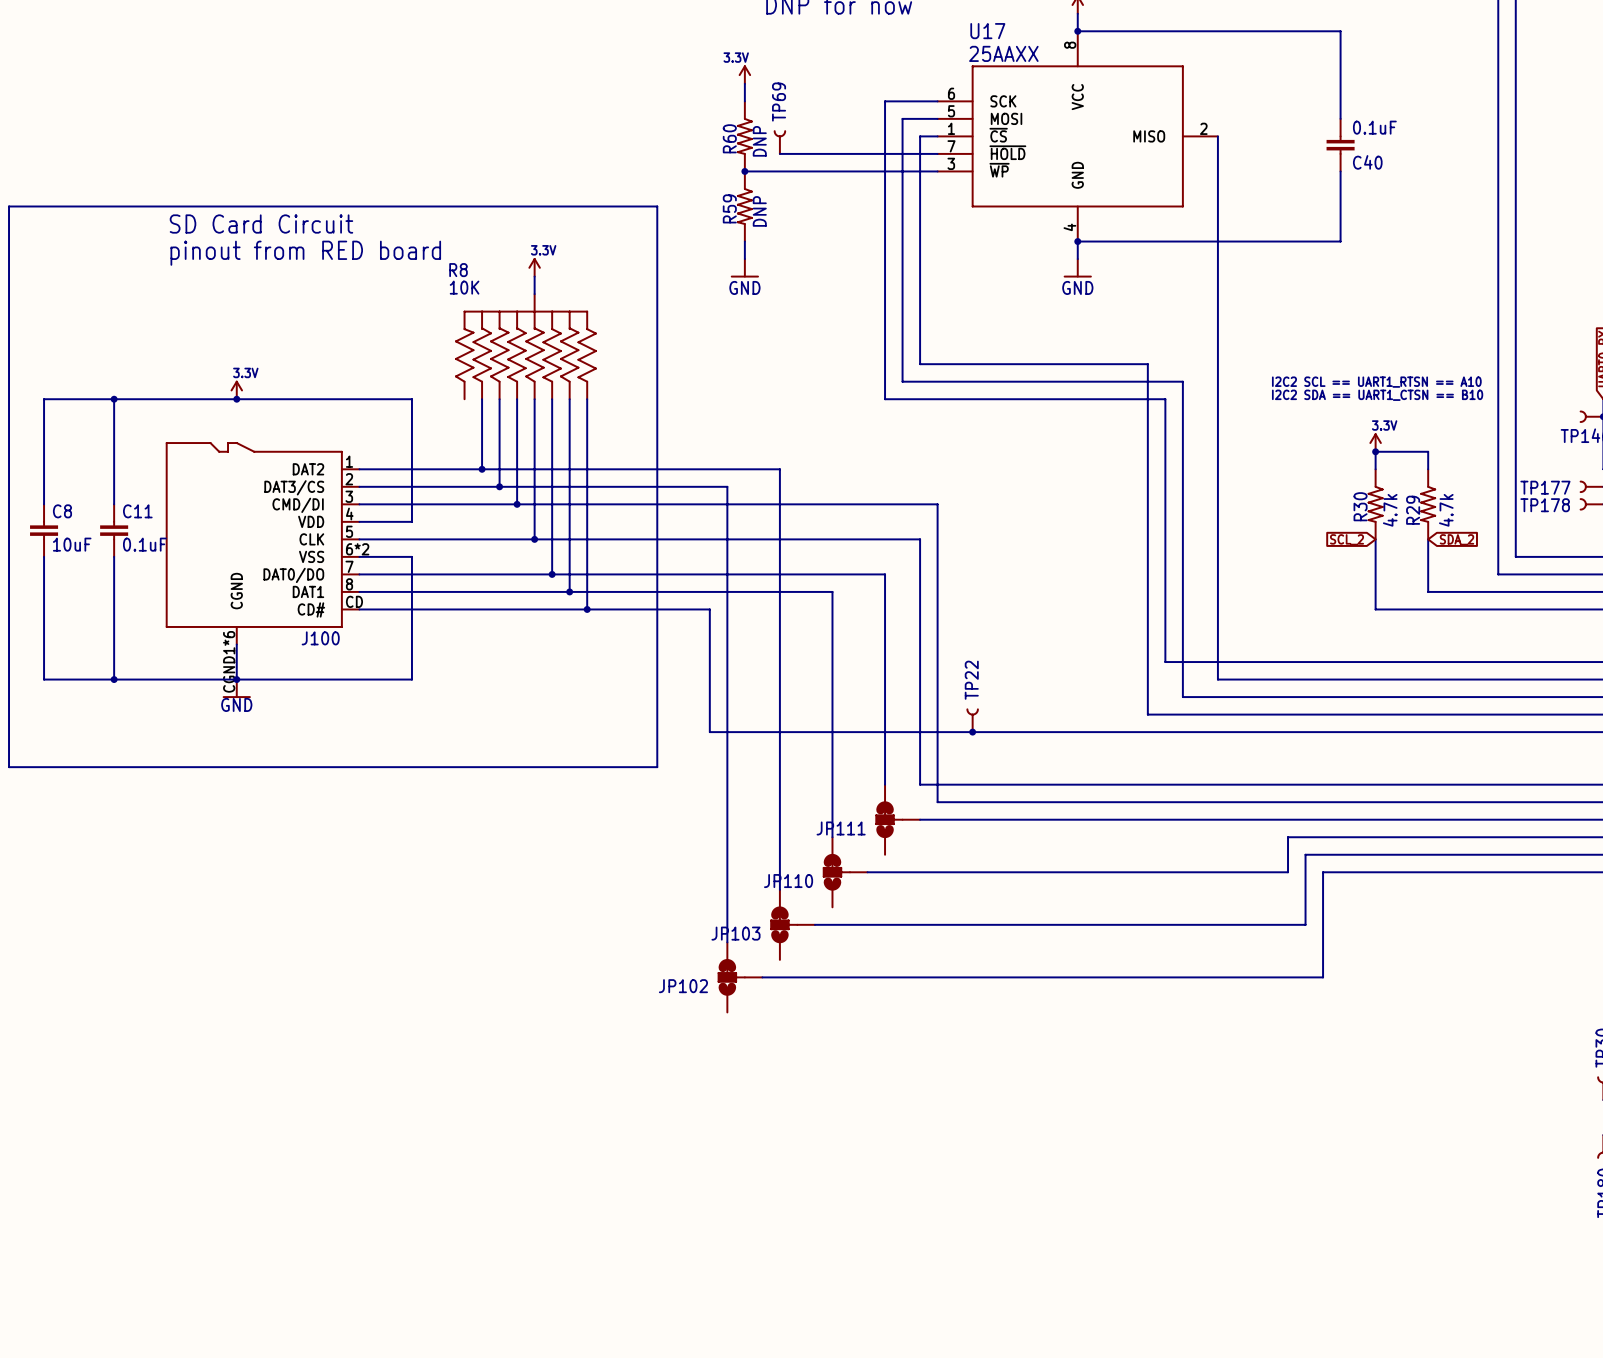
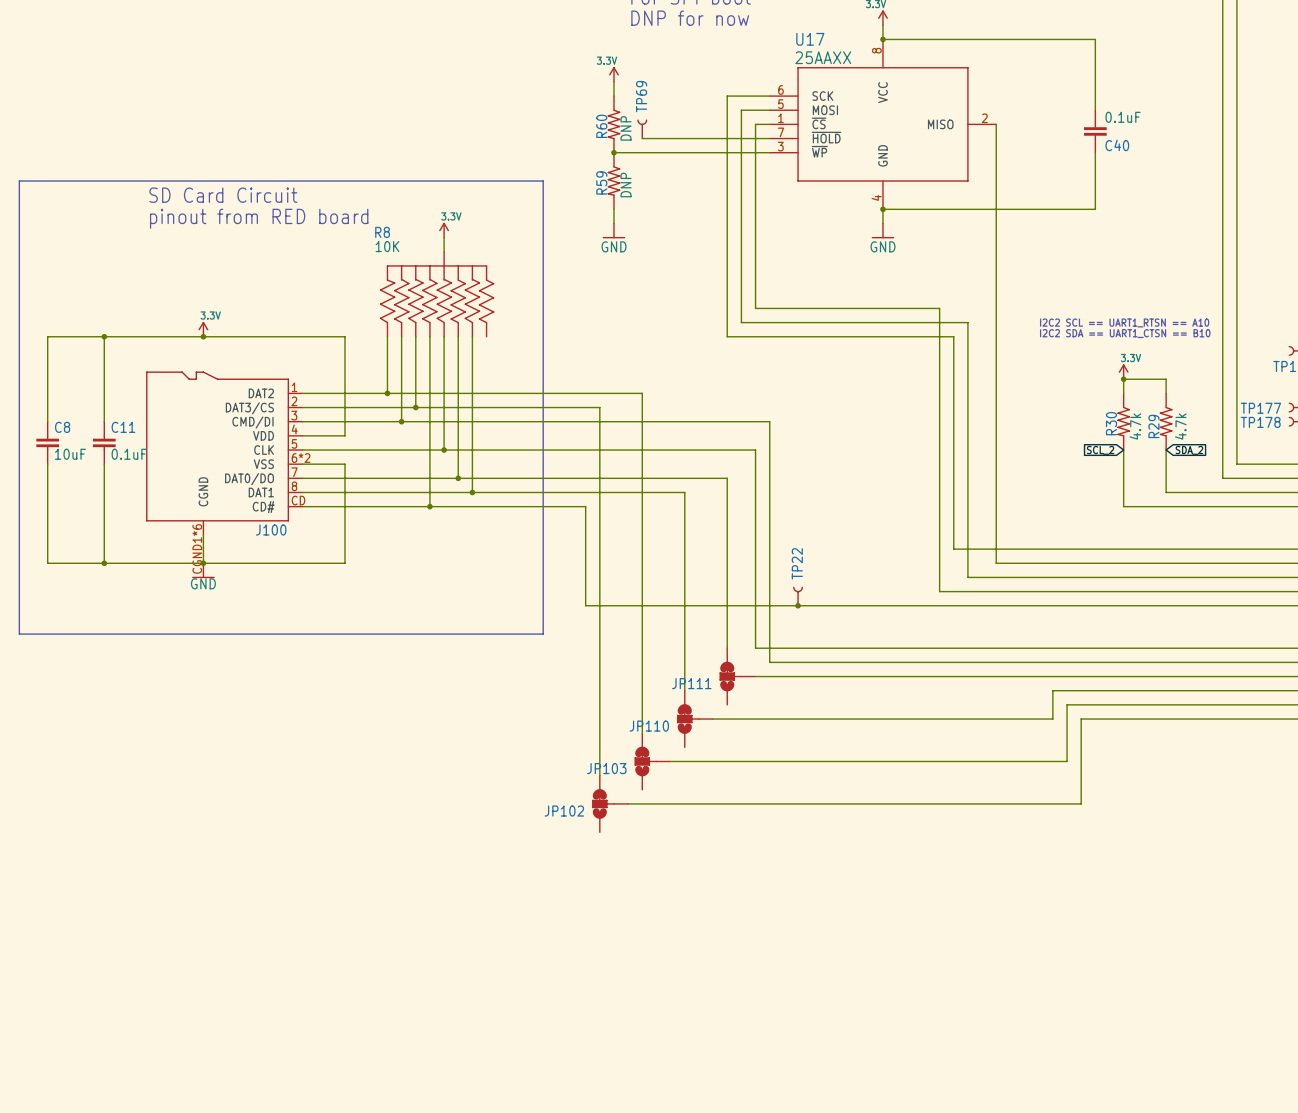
wire: none -> (387, 336) (387, 393)
wire: (587, 399) (587, 609) -> none
junction: none -> (387, 393)
wire: none -> (401, 393) (401, 421)
junction: (482, 469) -> none
junction: none -> (401, 421)
wire: none -> (429, 421) (429, 506)
junction: (517, 504) -> none
junction: none -> (429, 506)
junction: (587, 609) -> none

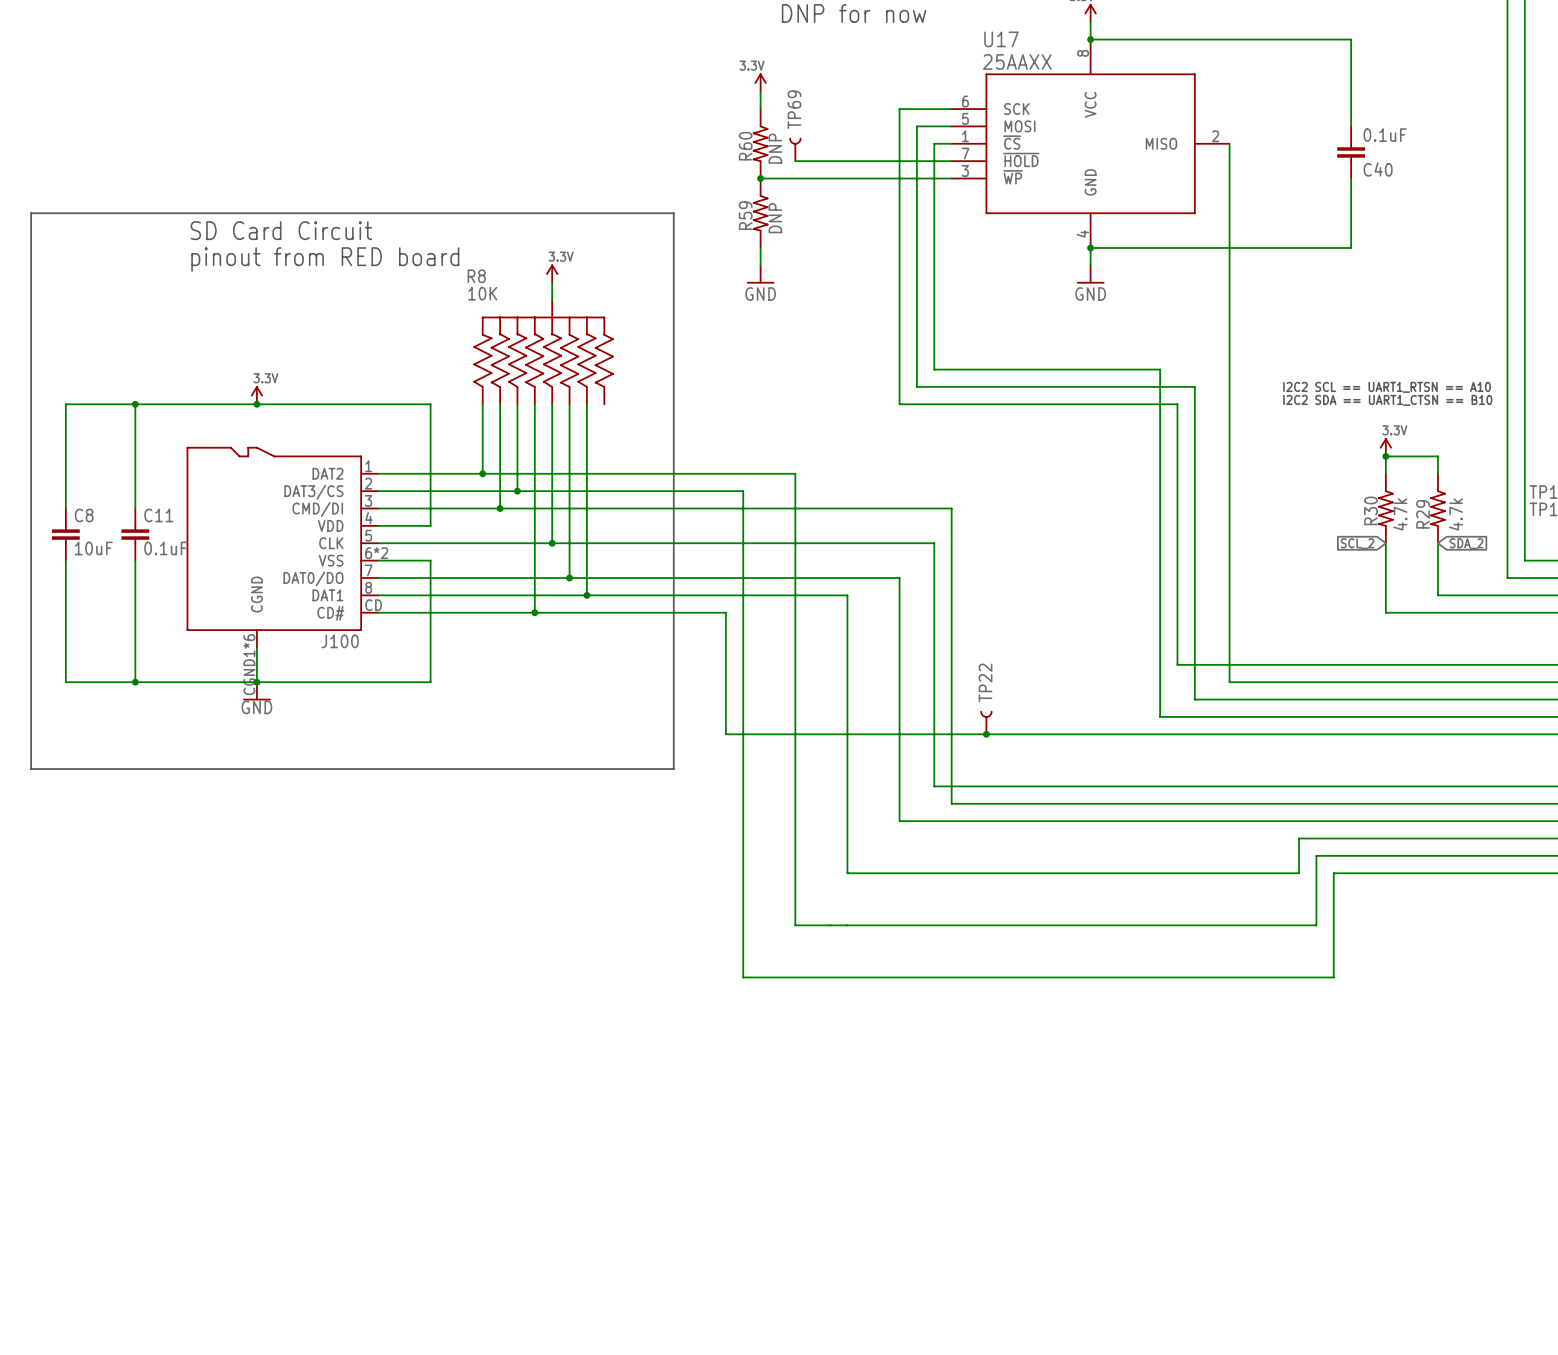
JP111: (737, 676) -> none
JP110: (695, 719) -> none
JP103: (652, 761) -> none
JP102: (610, 803) -> none

